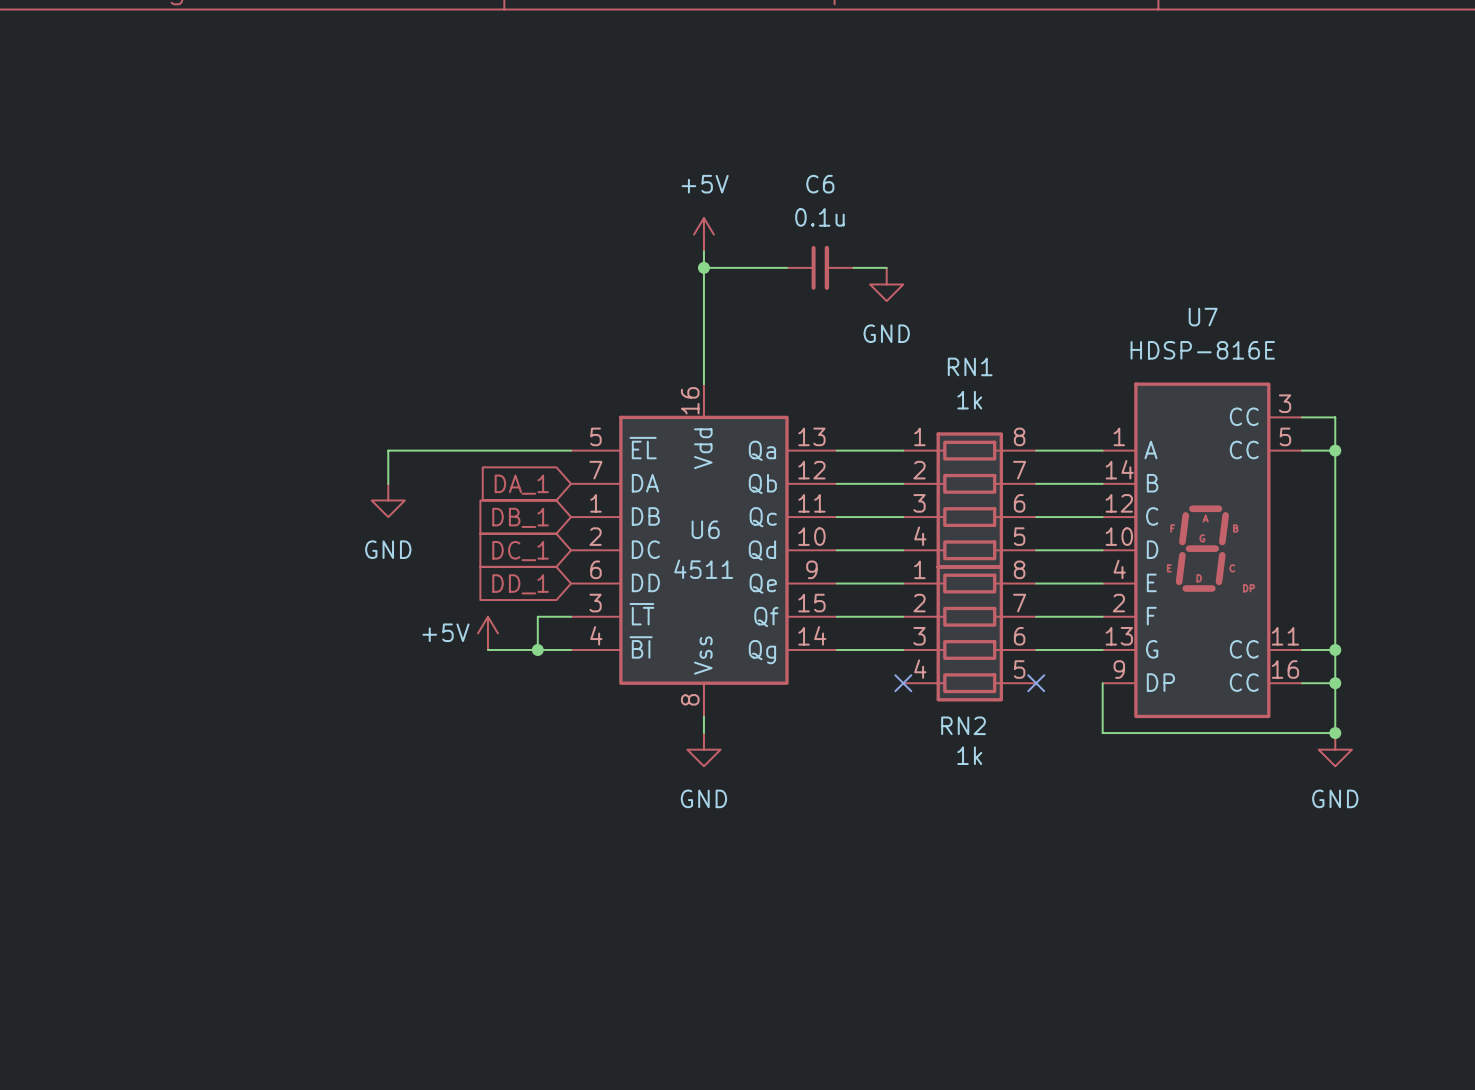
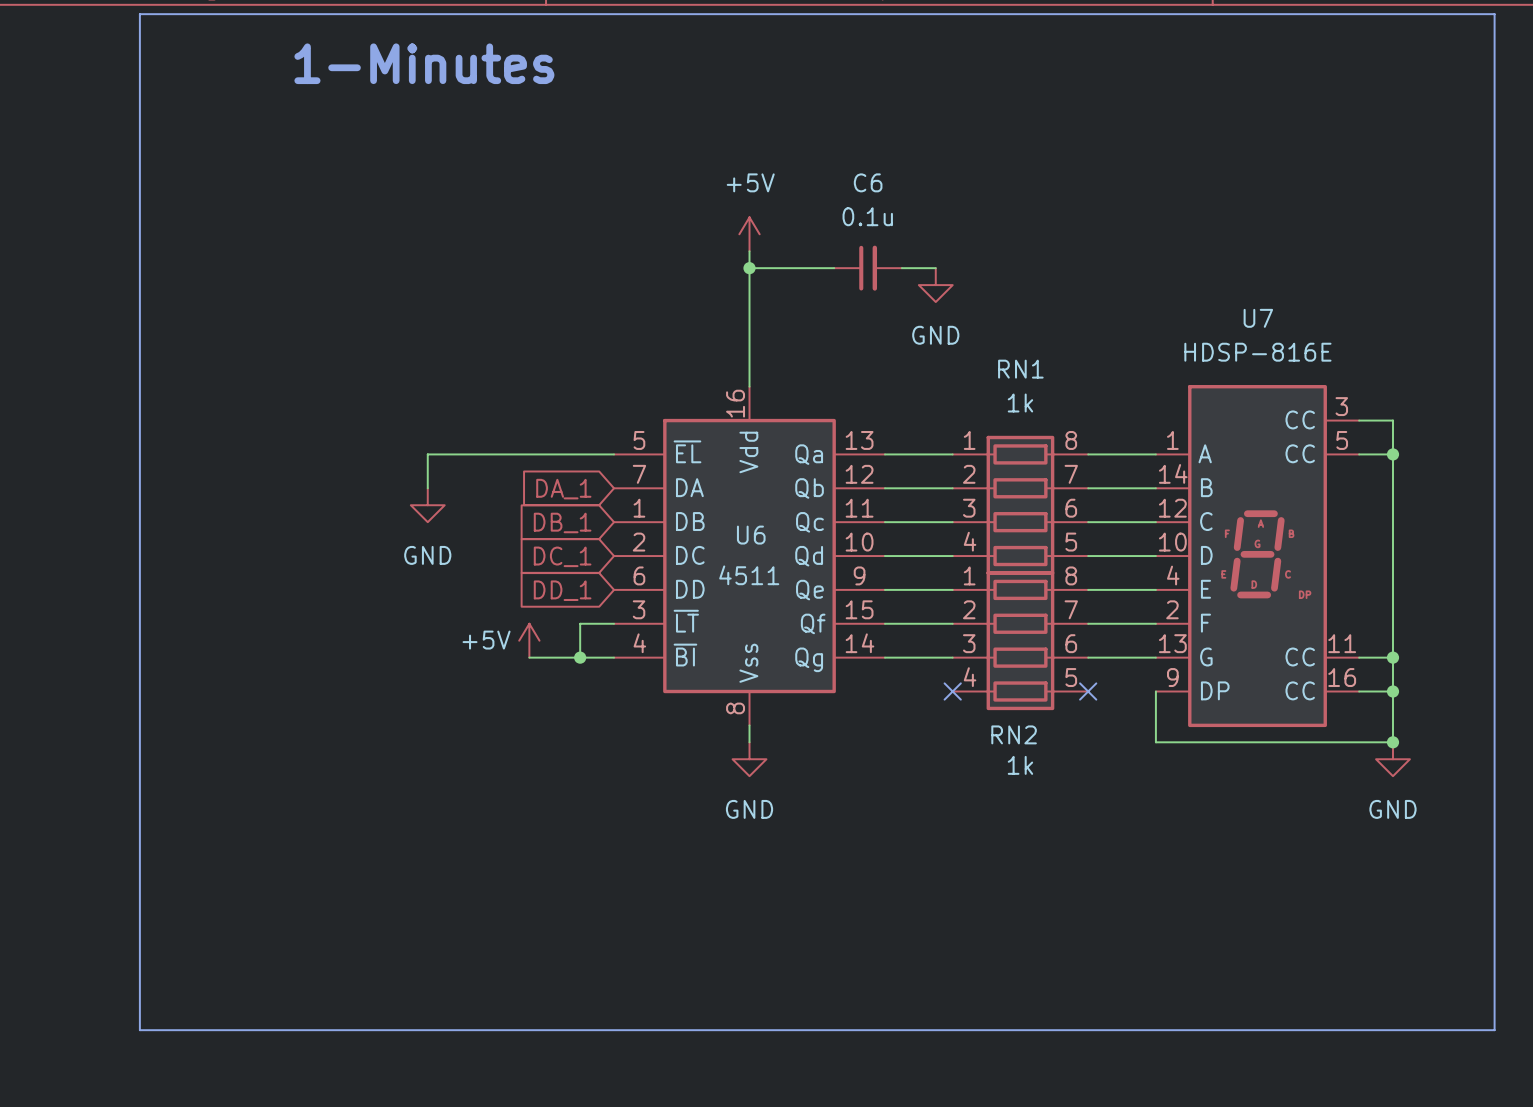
line: none -> (139, 14) (1494, 14) (1494, 1030) (139, 1030) (139, 14)
text: none -> 1-Minutes (424, 63)

